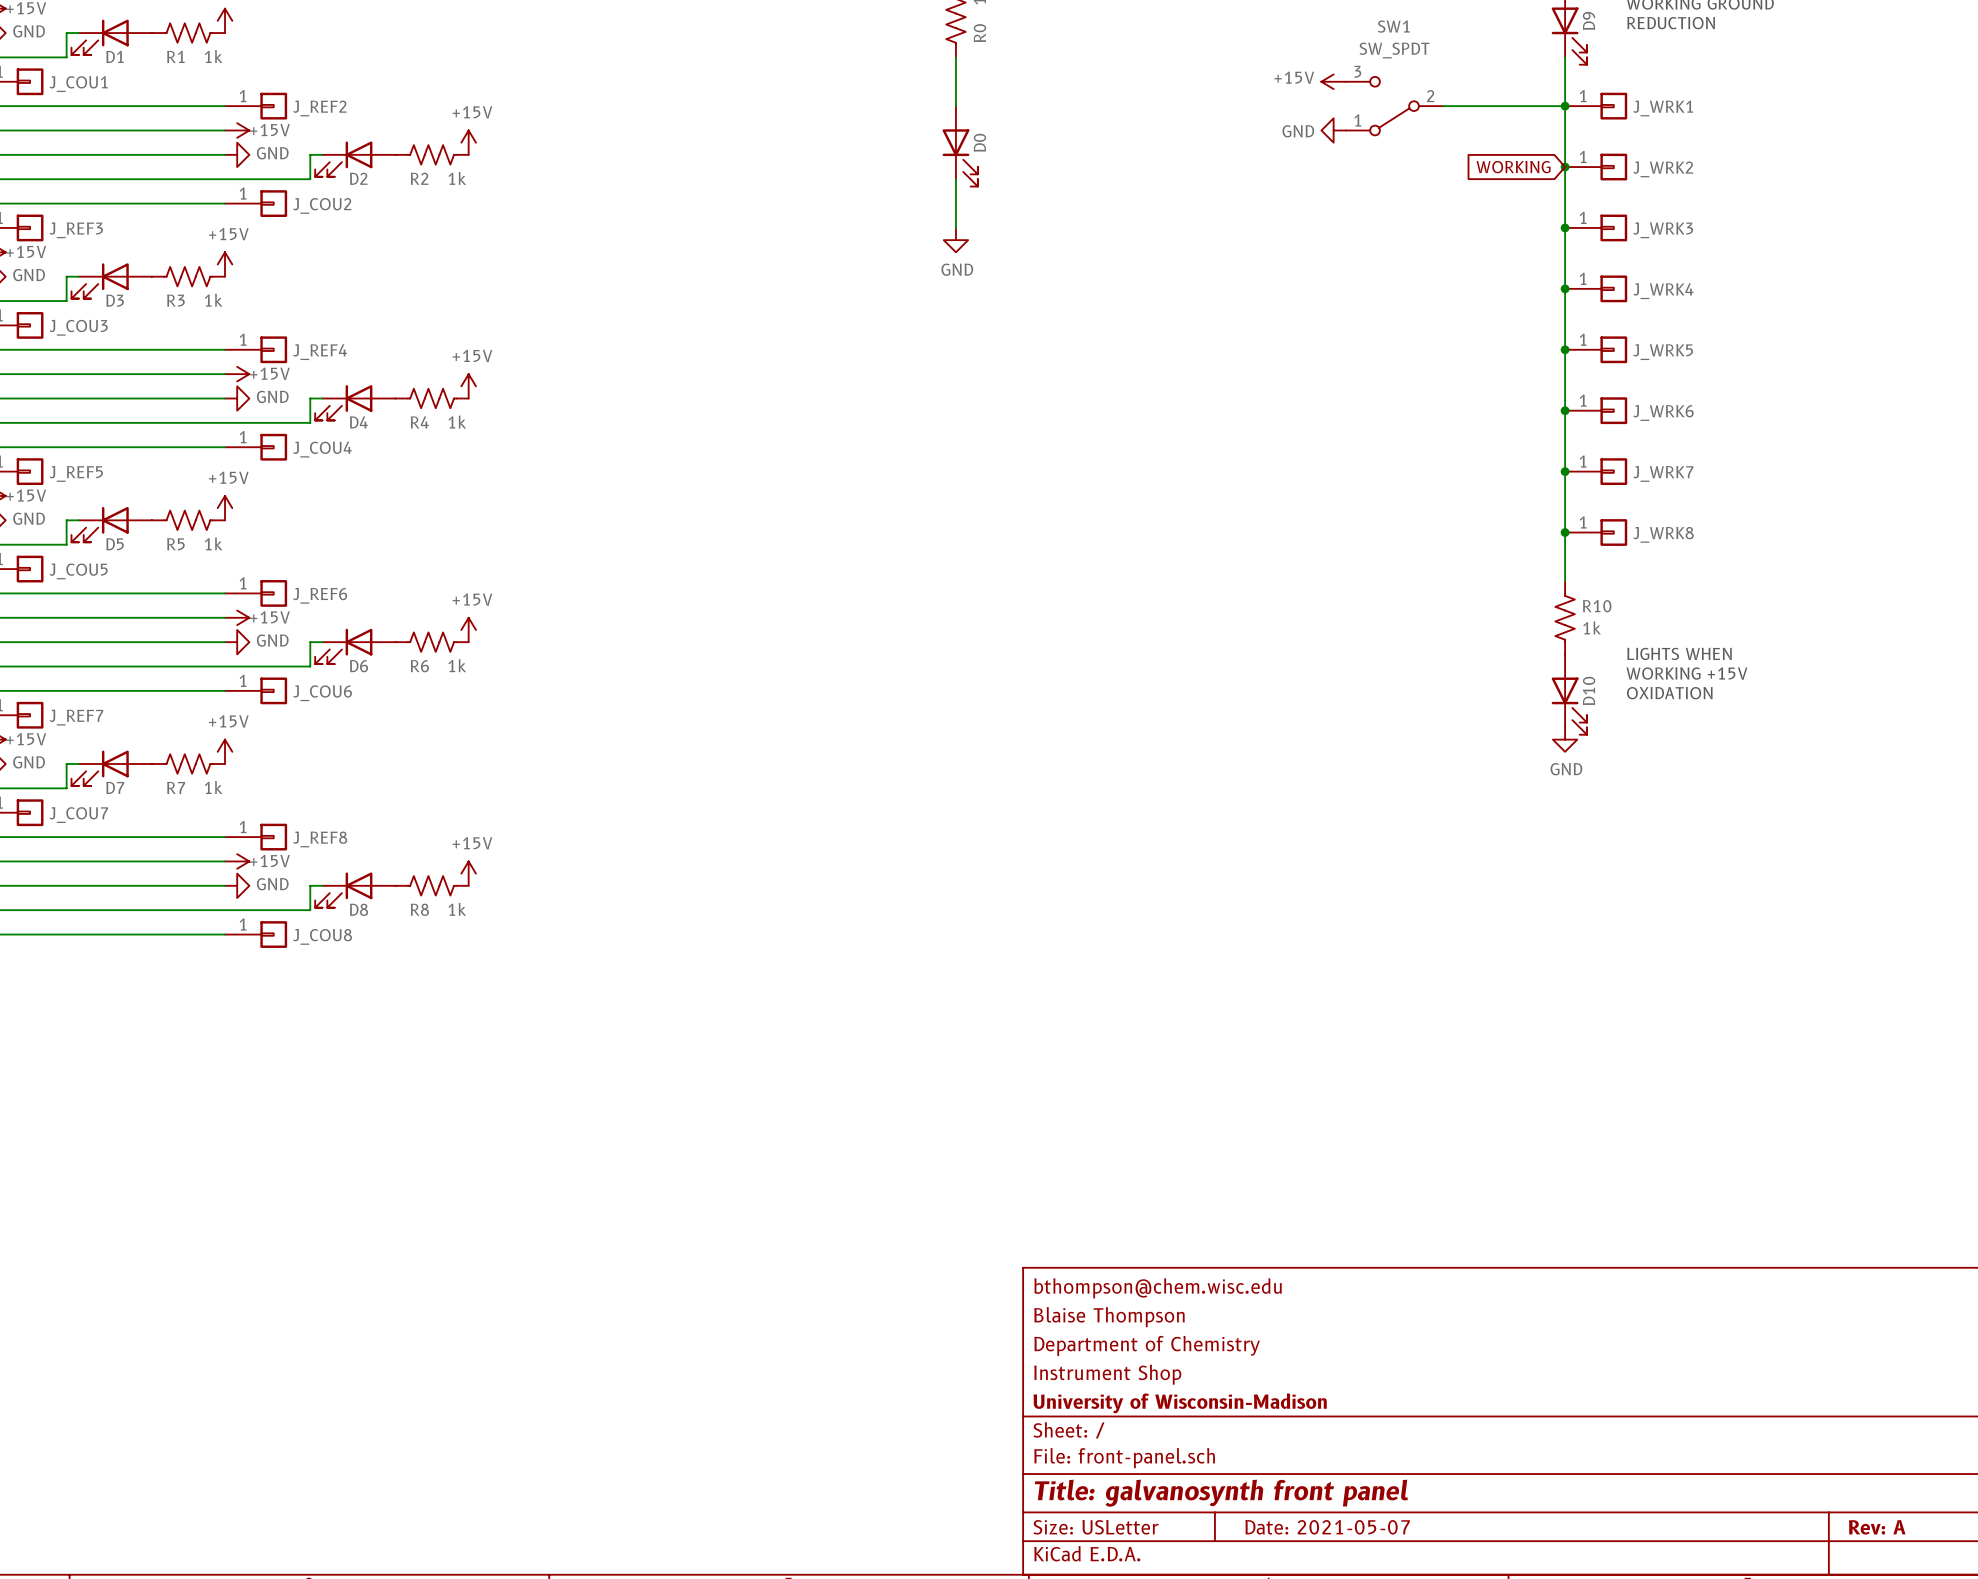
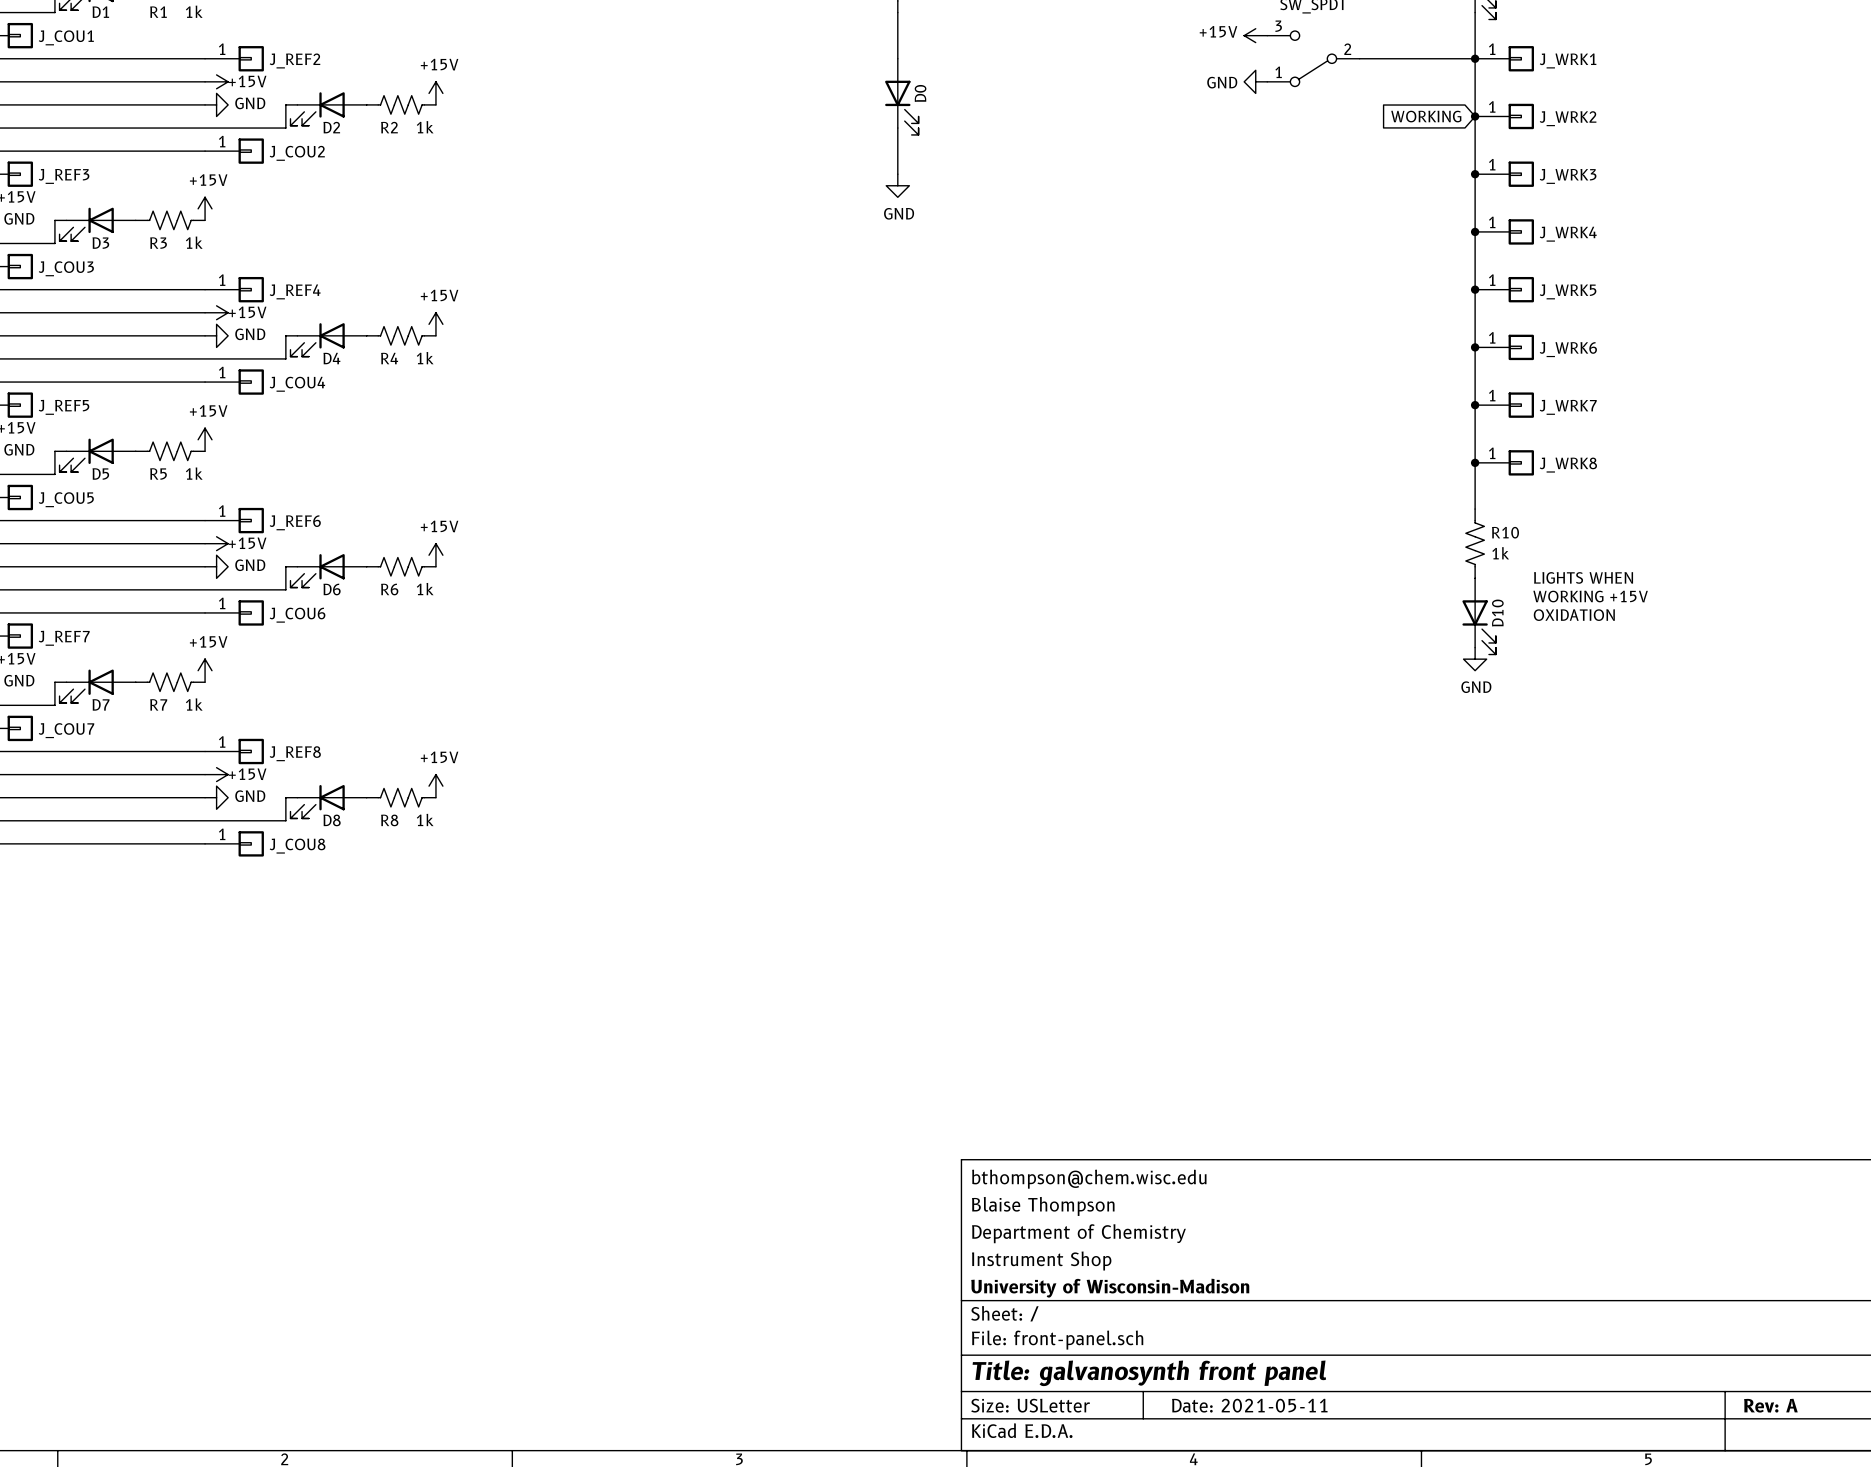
title block: Date: 2021-05-07 (1327, 1527) -> Date: 2021-05-11 (1249, 1405)

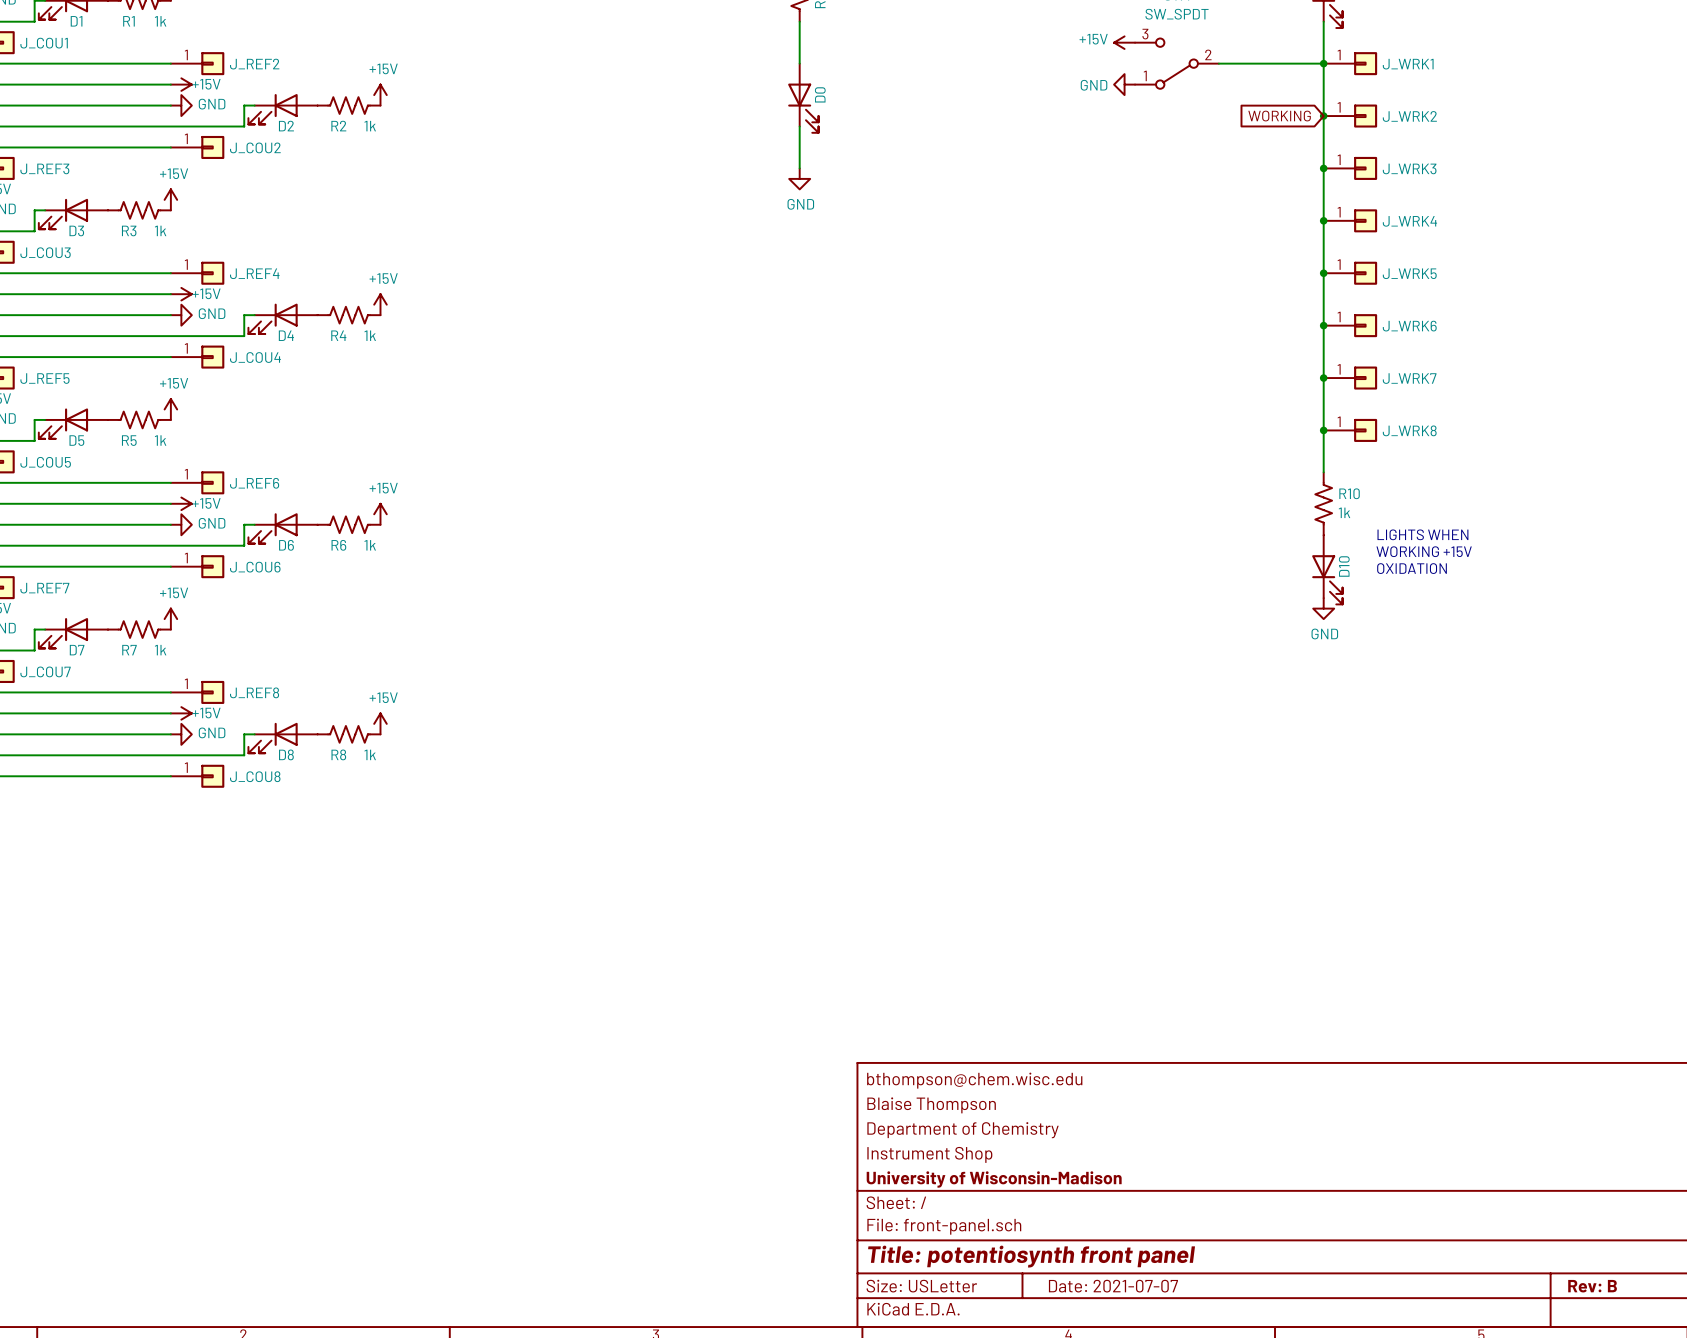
title block: Title: galvanosynth front panel (1149, 1373) -> Title: potentiosynth front panel (1031, 1256)
title block: Date: 2021-05-11 (1249, 1405) -> Date: 2021-07-07 (1113, 1286)
title block: Rev: A (1770, 1405) -> Rev: B (1592, 1286)

